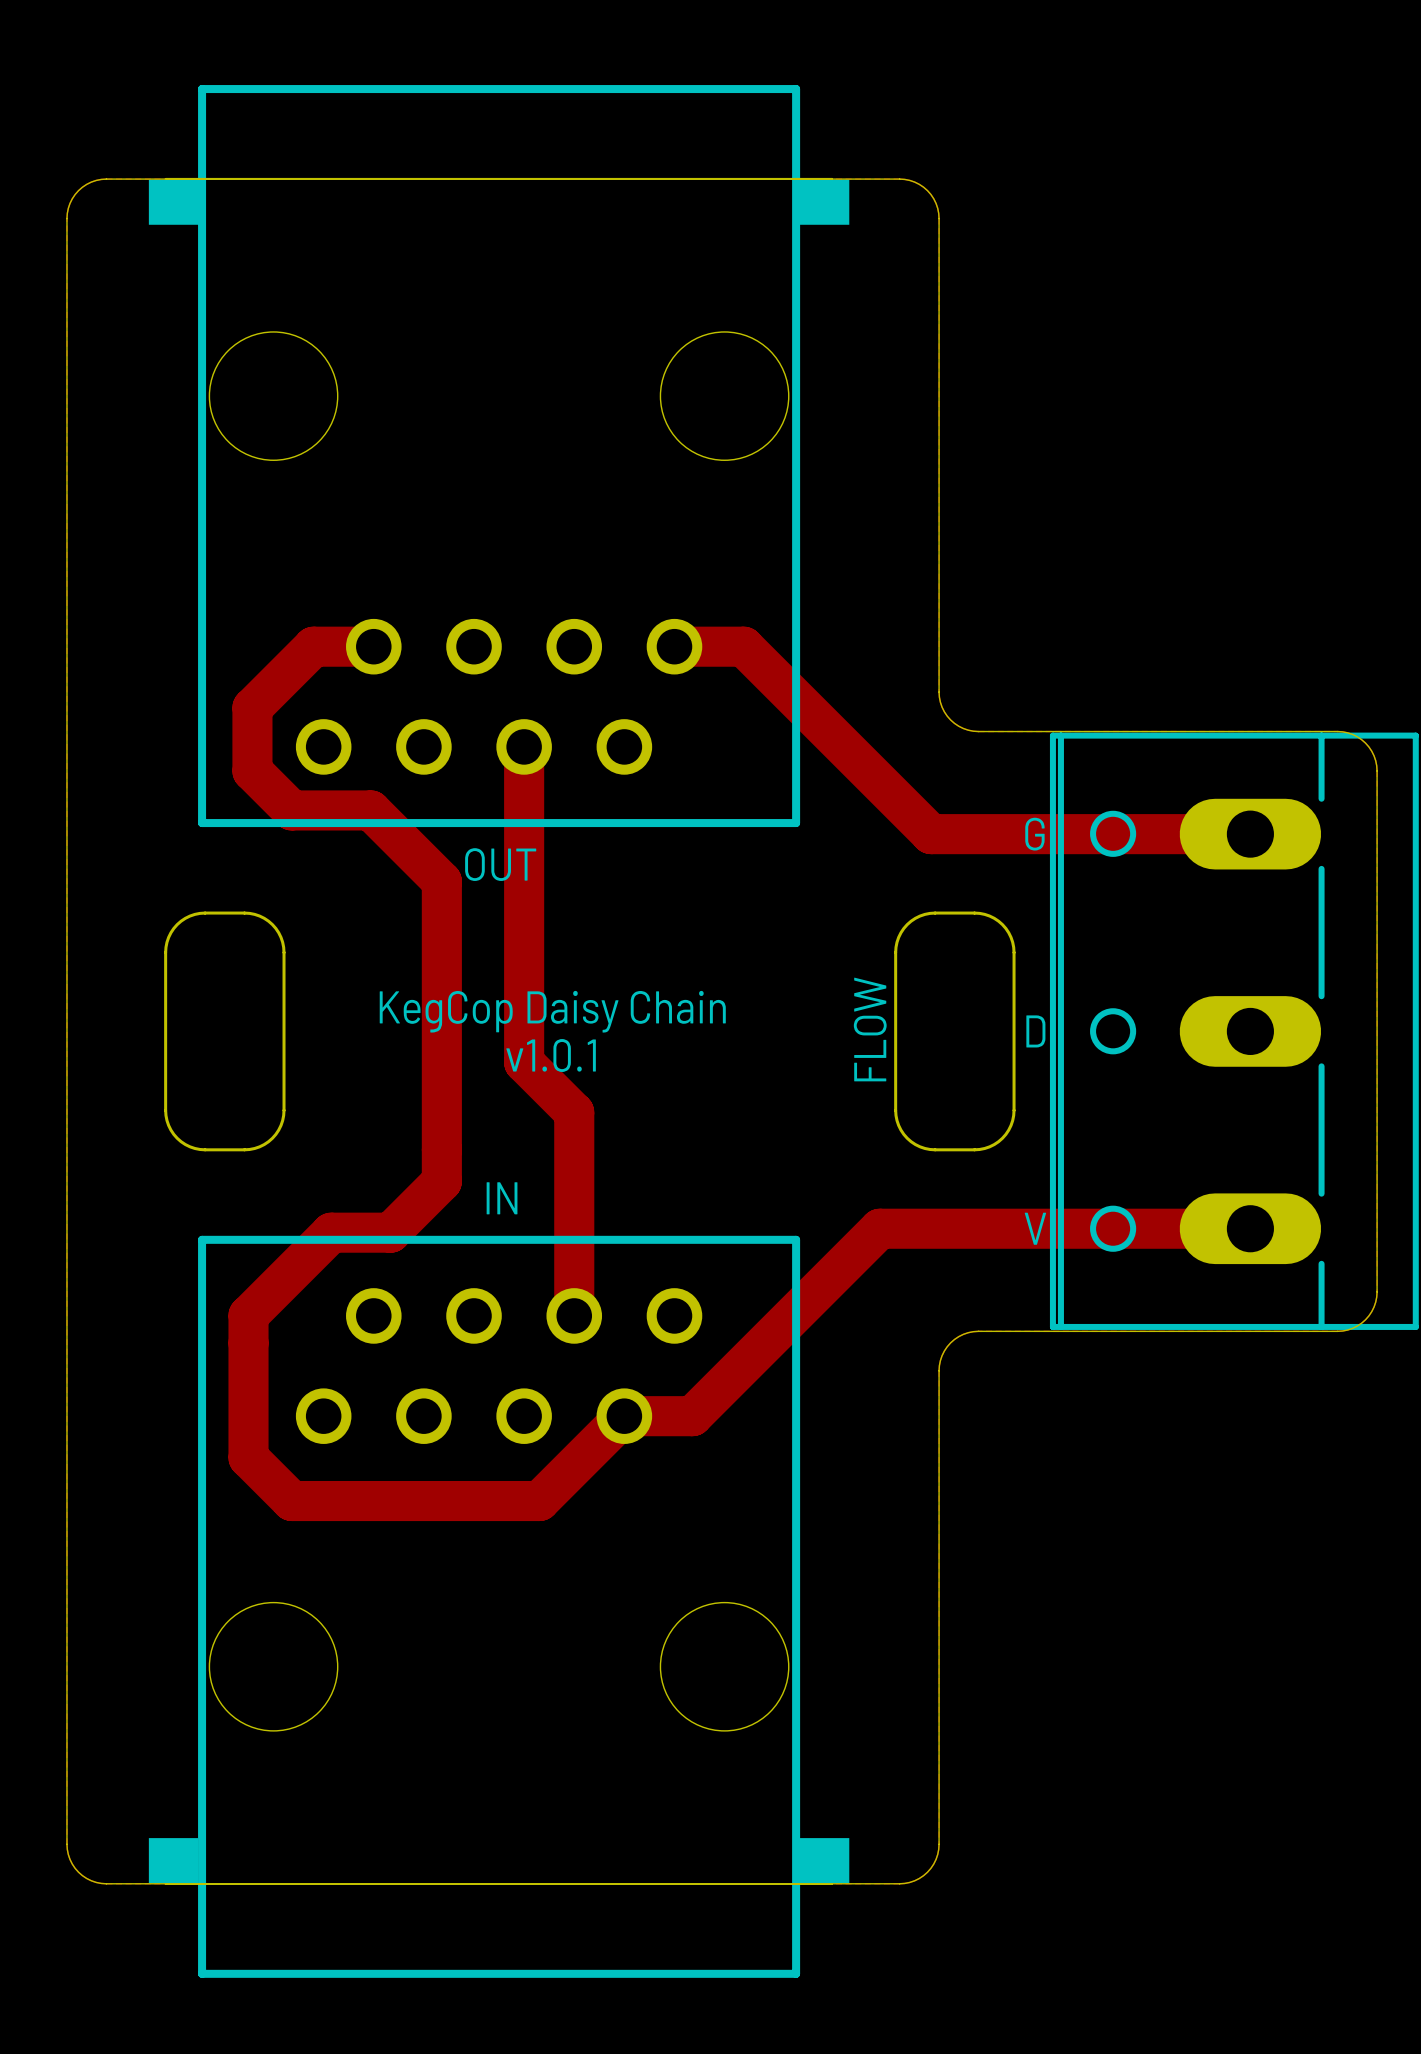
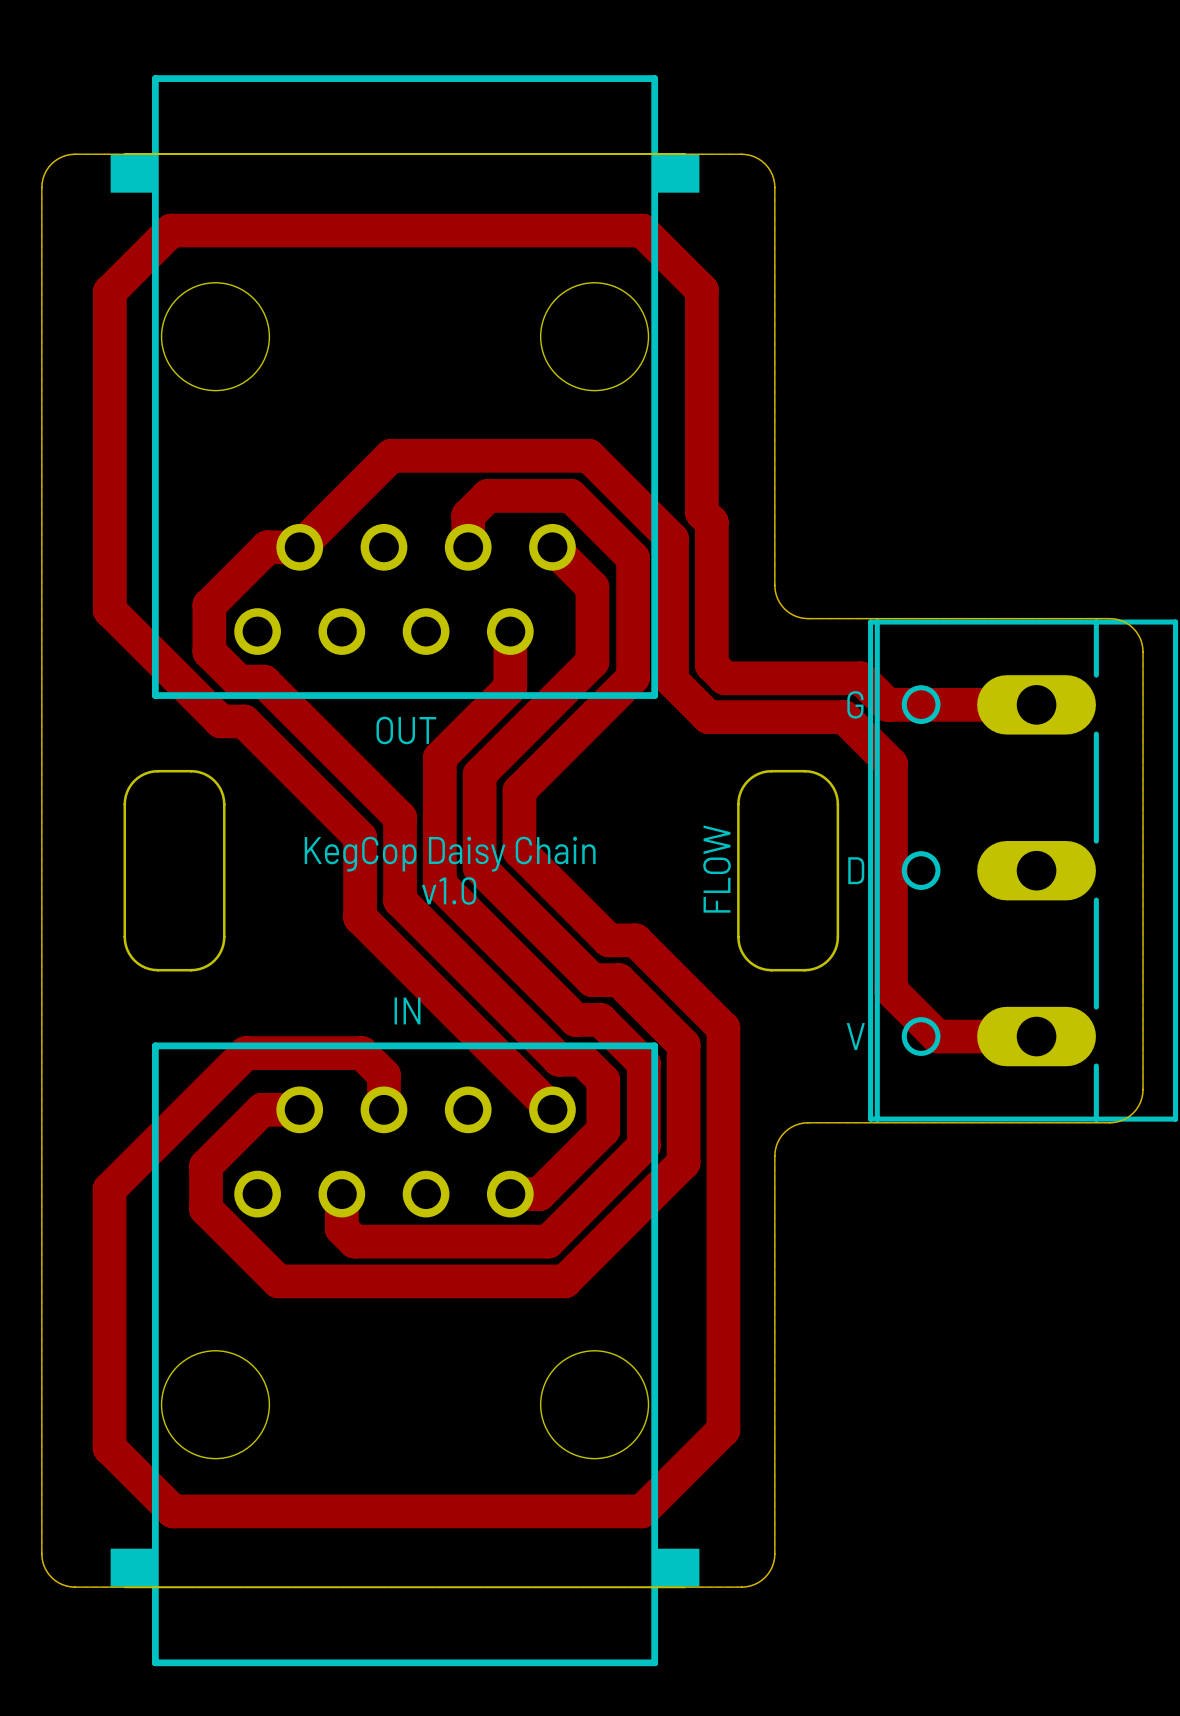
track: (335, 646) (313, 646) (252, 707) (252, 770) (291, 810) (370, 810) (441, 881) (441, 1181) (390, 1232) (331, 1232) (248, 1315) (248, 1457) (291, 1501) (539, 1501) (624, 1416) -> (267, 547) (209, 605) (209, 651) (239, 681) (264, 681) (400, 817) (400, 900) (559, 1059) (582, 1059) (603, 1080) (603, 1130) (539, 1194)
track: none -> (468, 547) (468, 515) (487, 495) (570, 495) (633, 558) (633, 677) (519, 791) (519, 850) (609, 940) (635, 940) (723, 1028) (723, 1429) (641, 1511) (173, 1511) (109, 1447) (109, 1189) (245, 1053) (361, 1053) (383, 1075) (383, 1109)
track: (674, 646) (743, 646) (931, 834) (1073, 834) -> (552, 1109) (360, 917) (360, 837) (244, 721) (220, 721) (109, 610) (109, 291) (171, 230) (642, 230) (701, 290) (701, 512) (711, 522) (711, 665) (725, 678) (861, 678) (887, 704)
track: none -> (552, 547) (592, 587) (592, 661) (479, 774) (479, 867) (592, 980) (618, 980) (683, 1044) (683, 1162) (564, 1281) (278, 1281) (206, 1209) (206, 1165) (262, 1109) (299, 1109)
track: (524, 746) (524, 1062) (574, 1112) (574, 1315) -> none
track: none -> (510, 631) (510, 687) (439, 757) (439, 883) (575, 1019) (600, 1019) (643, 1063) (643, 1145) (548, 1241) (354, 1241) (341, 1228) (341, 1194)
text: v1.0.1 (551, 1055) -> v1.0 (449, 890)
track: (1132, 1228) (879, 1228) (692, 1416) (658, 1416) -> (937, 1036) (890, 990) (890, 763) (844, 717) (708, 717) (672, 680) (672, 539) (588, 455) (391, 455) (299, 547)

